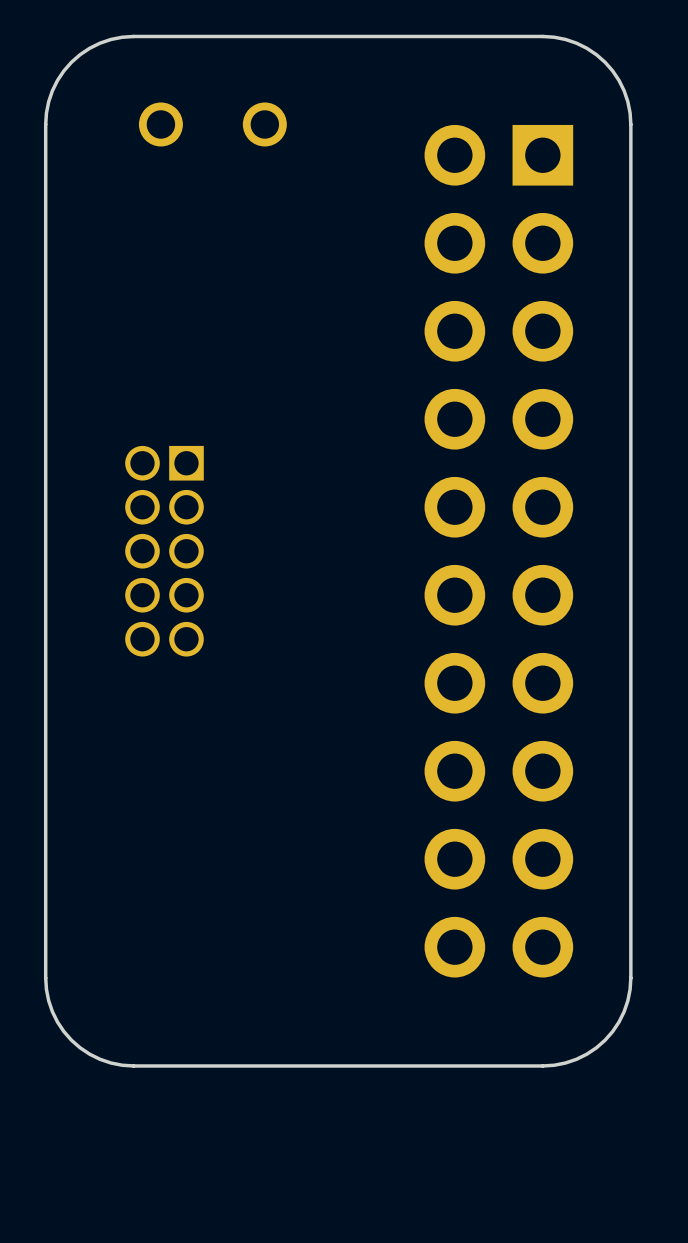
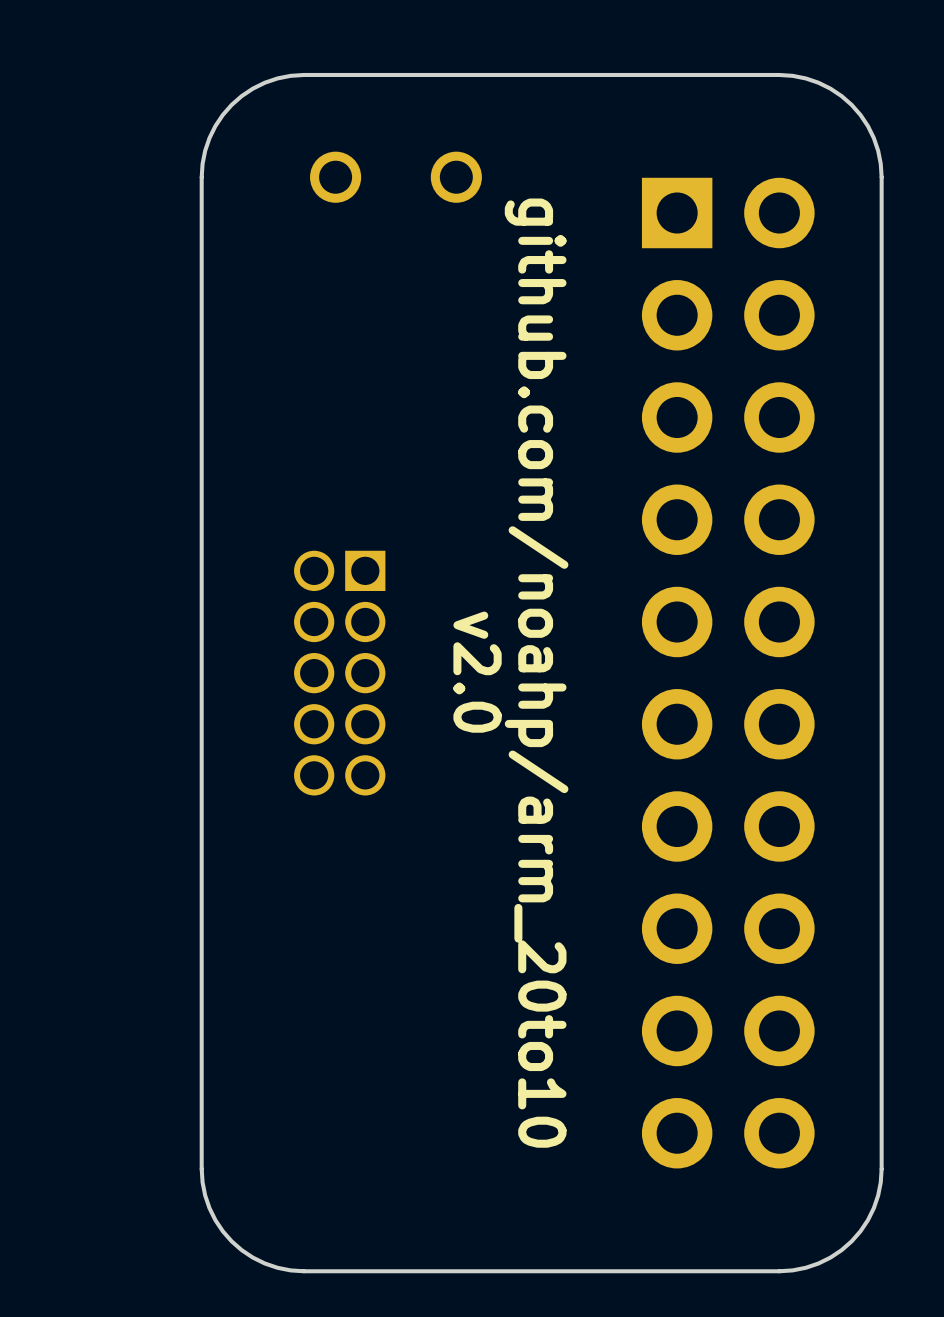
part footprint: [424, 124, 574, 978] -> [641, 177, 815, 1169]
text: none -> v2.0 (477, 672)
text: none -> github.com/noahp/arm_20to10 (536, 673)

